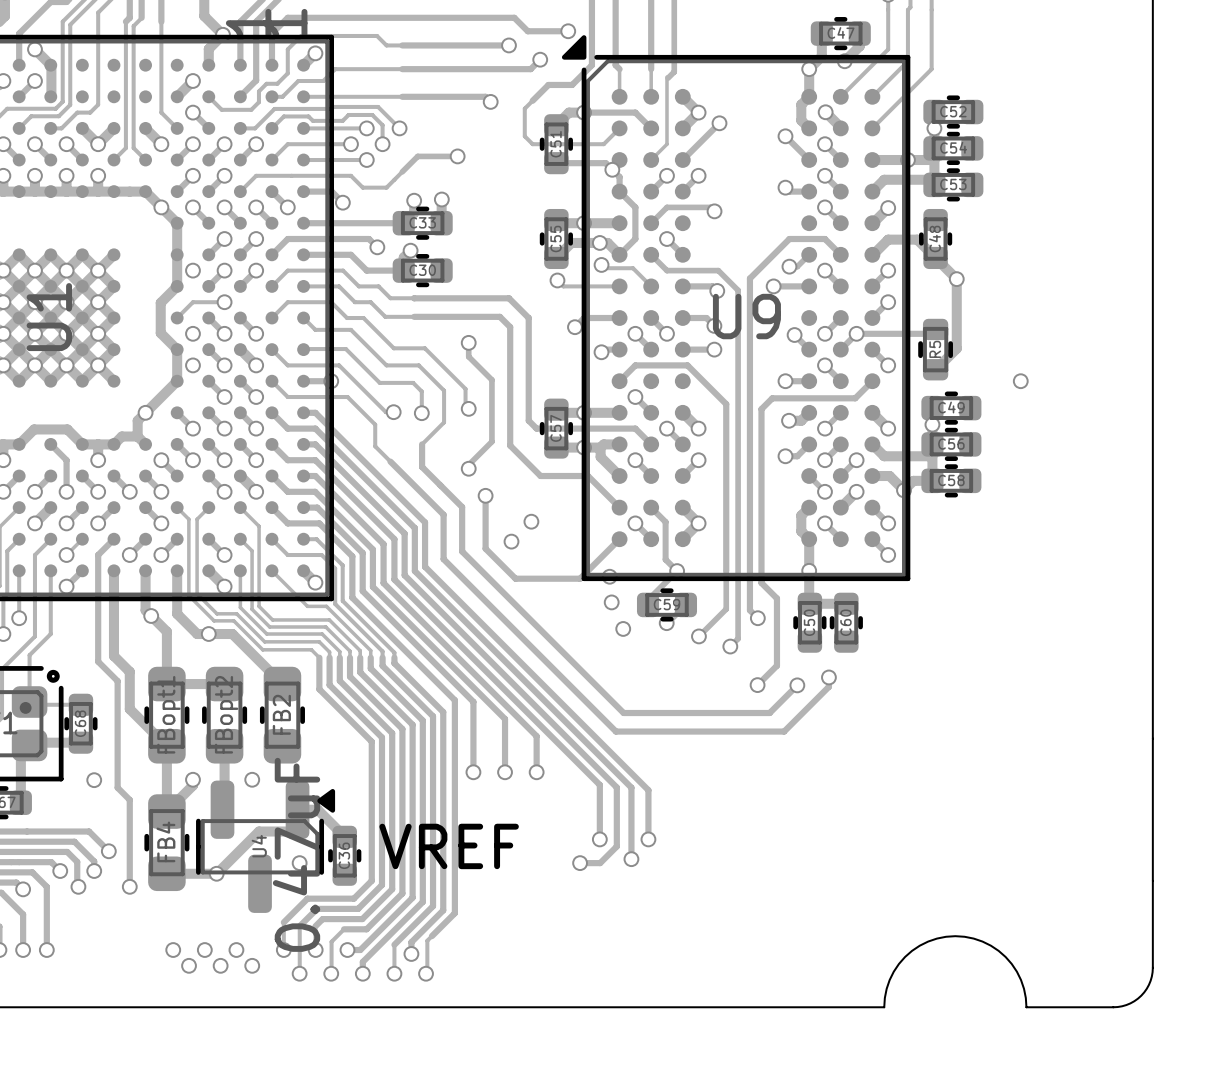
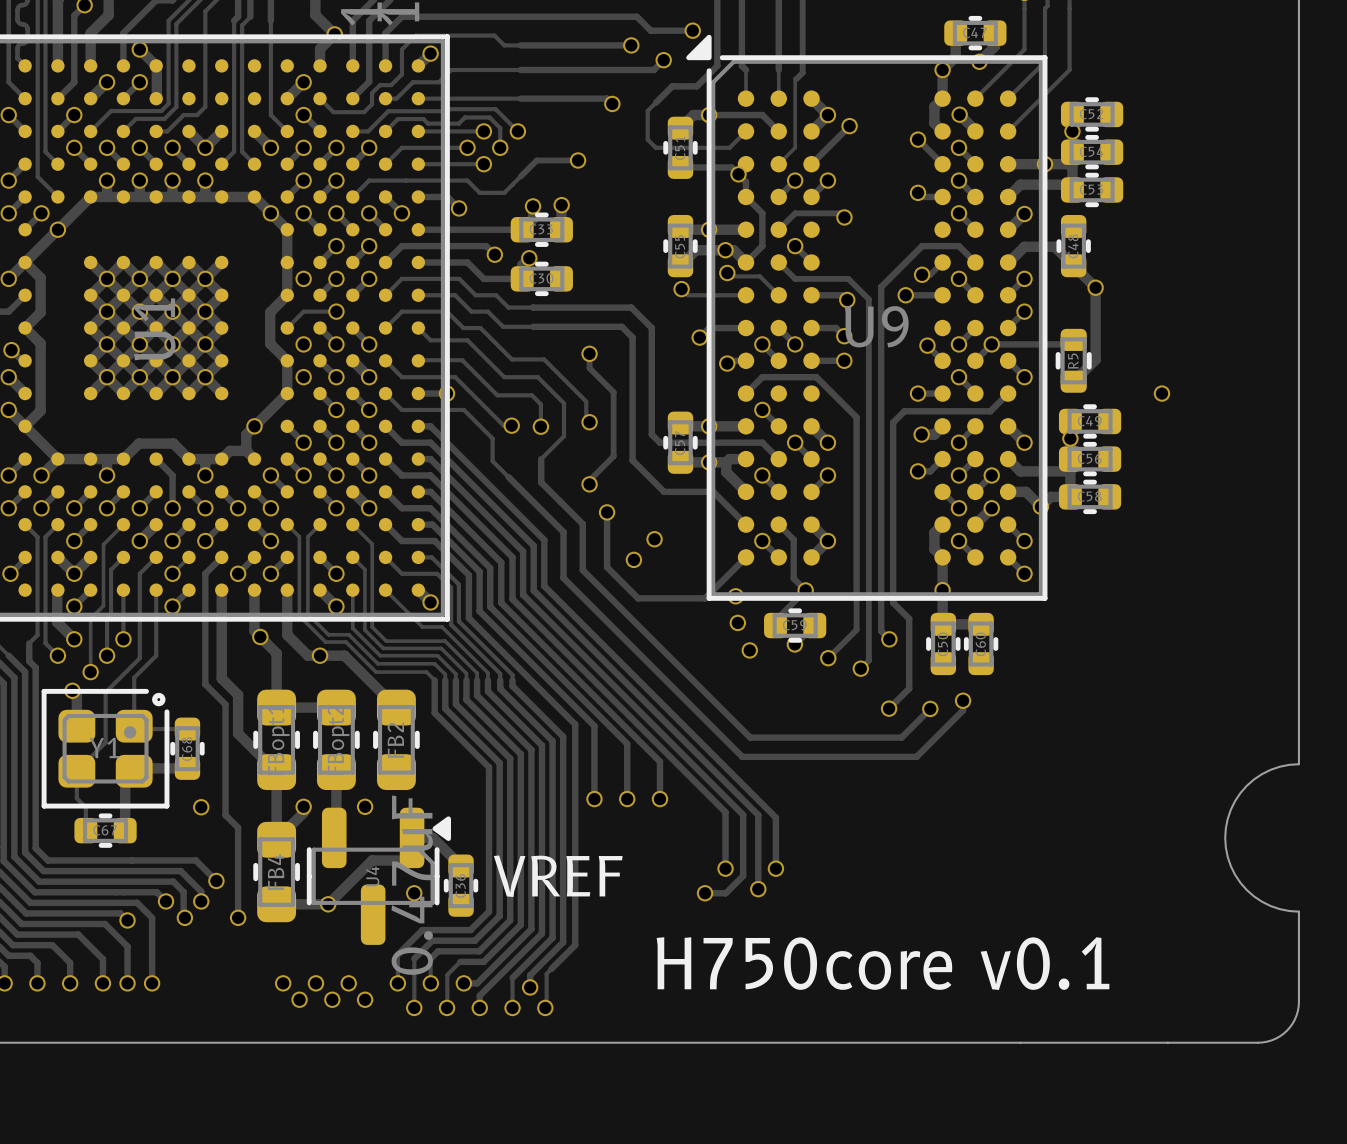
board edge: (1152, 738) (1152, 880) -> (1298, 764) (1270, 769) (1246, 785) (1230, 809) (1225, 837) (1230, 866) (1246, 890) (1270, 906) (1298, 911)
text: none -> H750core v0.1 (883, 963)
board edge: (884, 1007) (889, 980) (905, 956) (928, 941) (955, 936) (982, 941) (1005, 956) (1021, 980) (1026, 1007) -> (1020, 1042) (1167, 1042)

